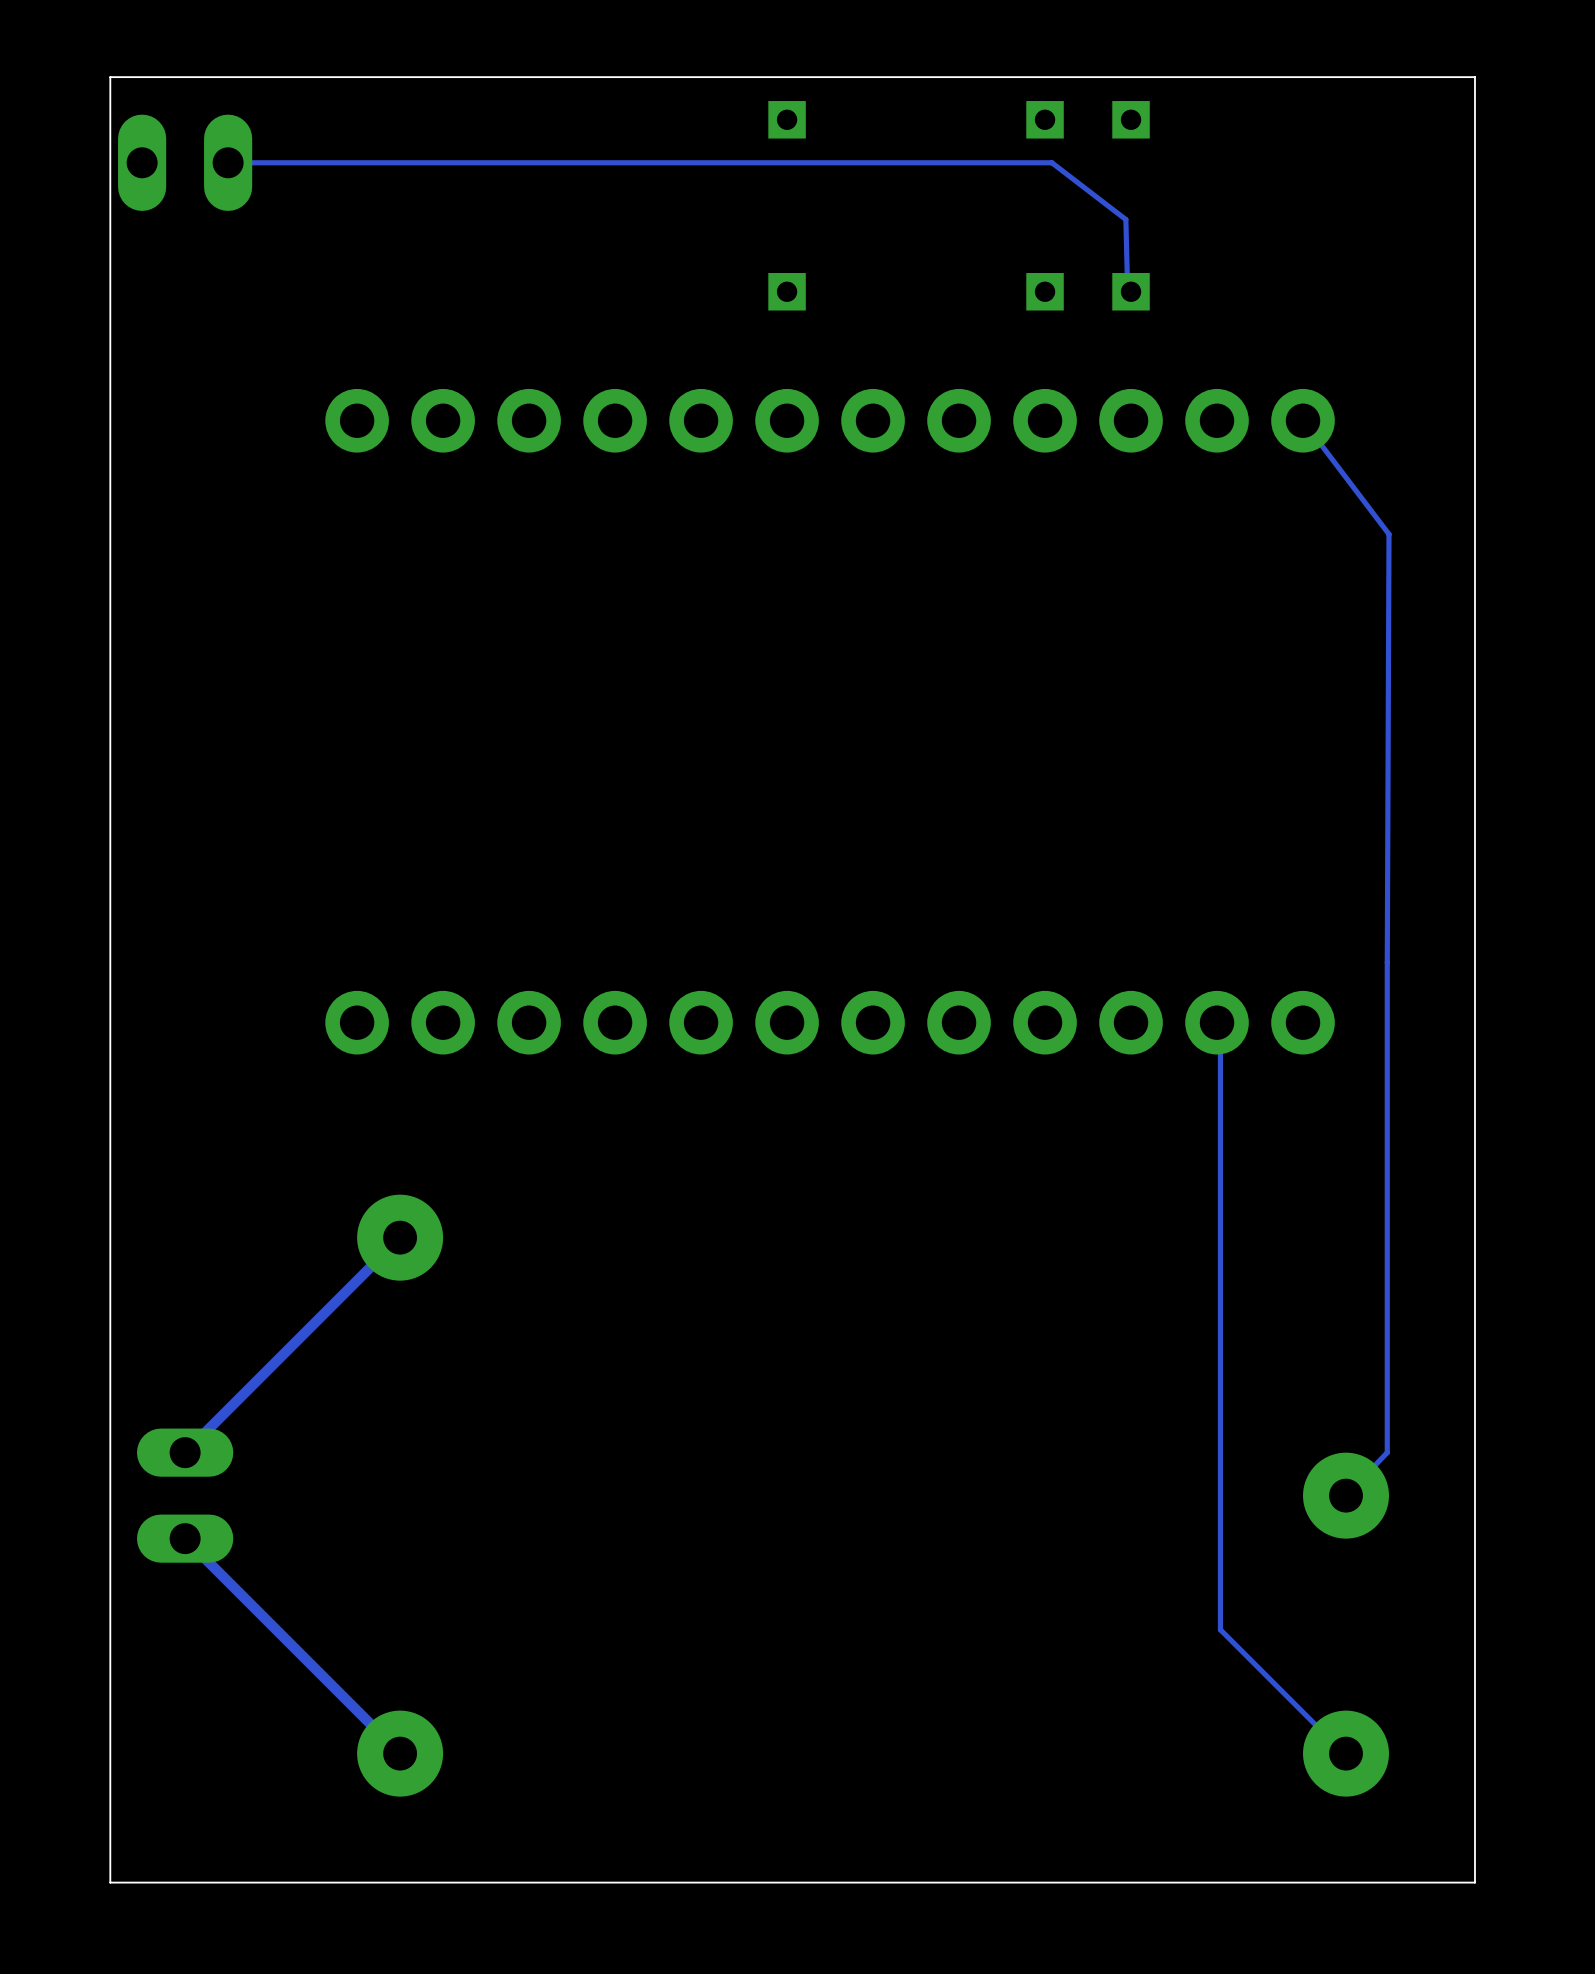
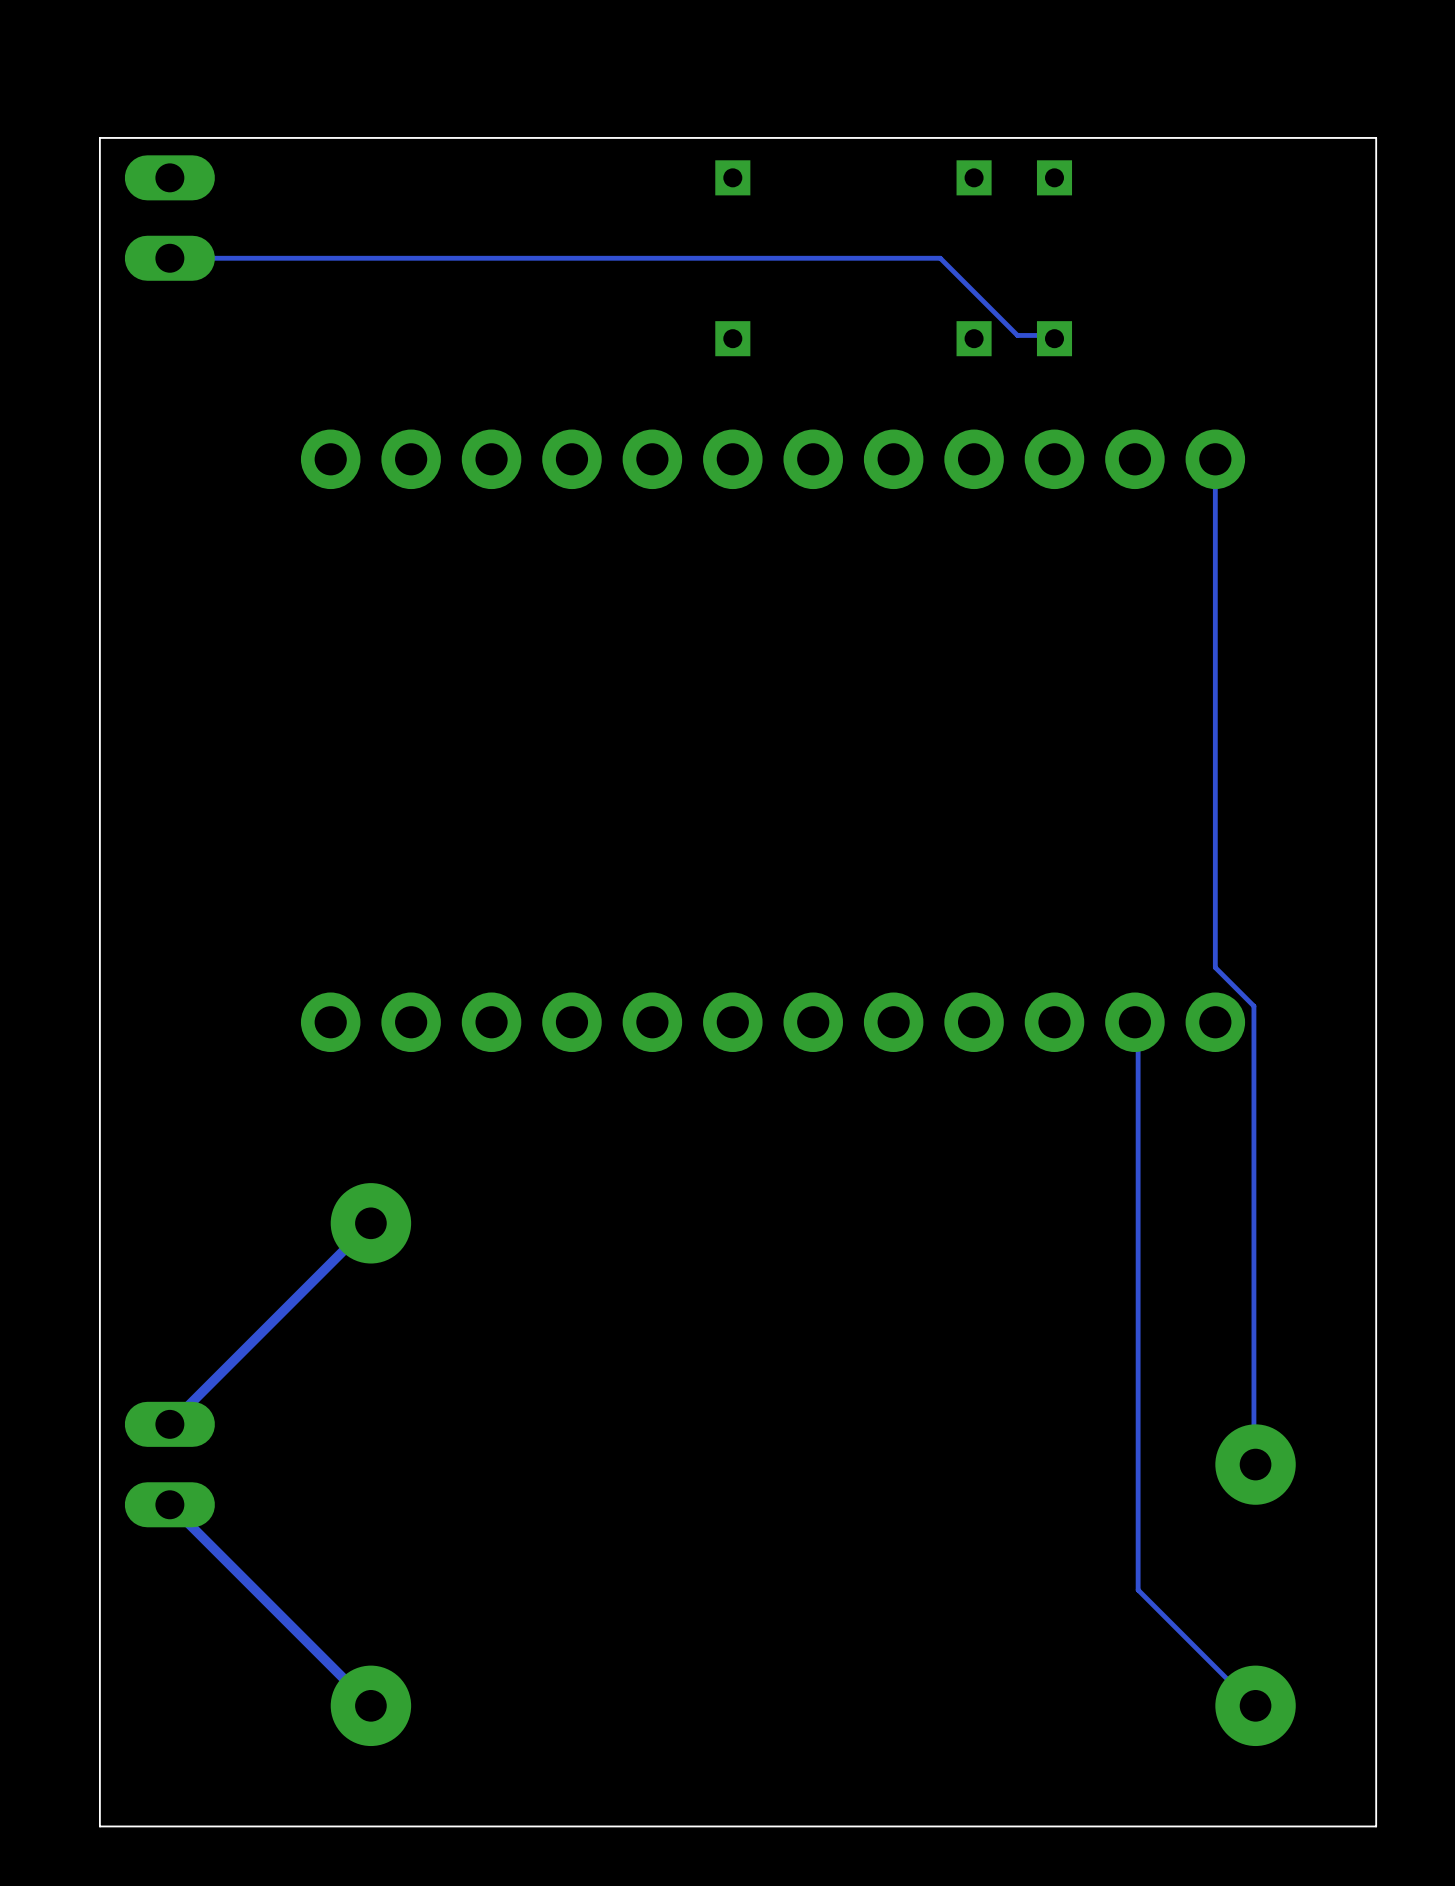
part rotation: 0° (185, 162) -> 90° clockwise (169, 218)
track: (228, 162) (1051, 162) (1125, 219) (1127, 288) -> (169, 258) (940, 258) (1017, 335) (1051, 335)
track: (1303, 420) (1389, 534) (1387, 1452) (1346, 1495) -> (1215, 459) (1215, 967) (1253, 1006) (1253, 1464) (1255, 1464)

